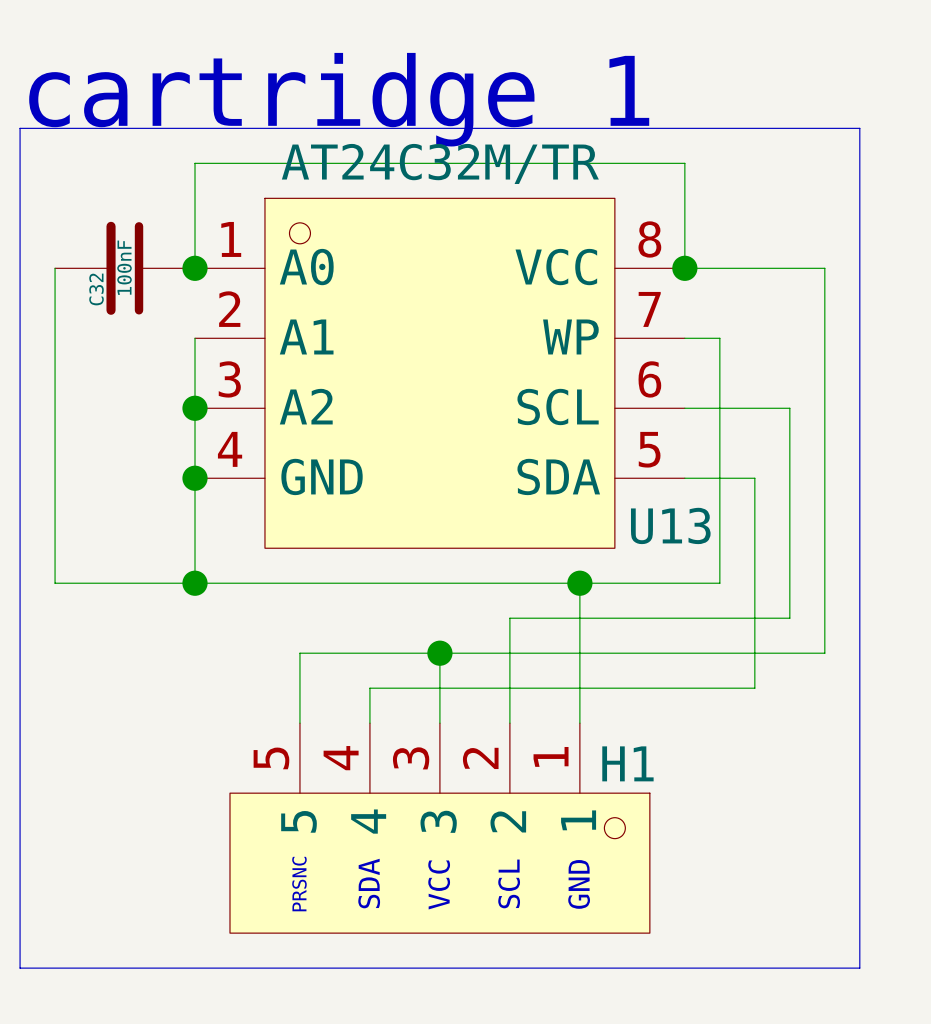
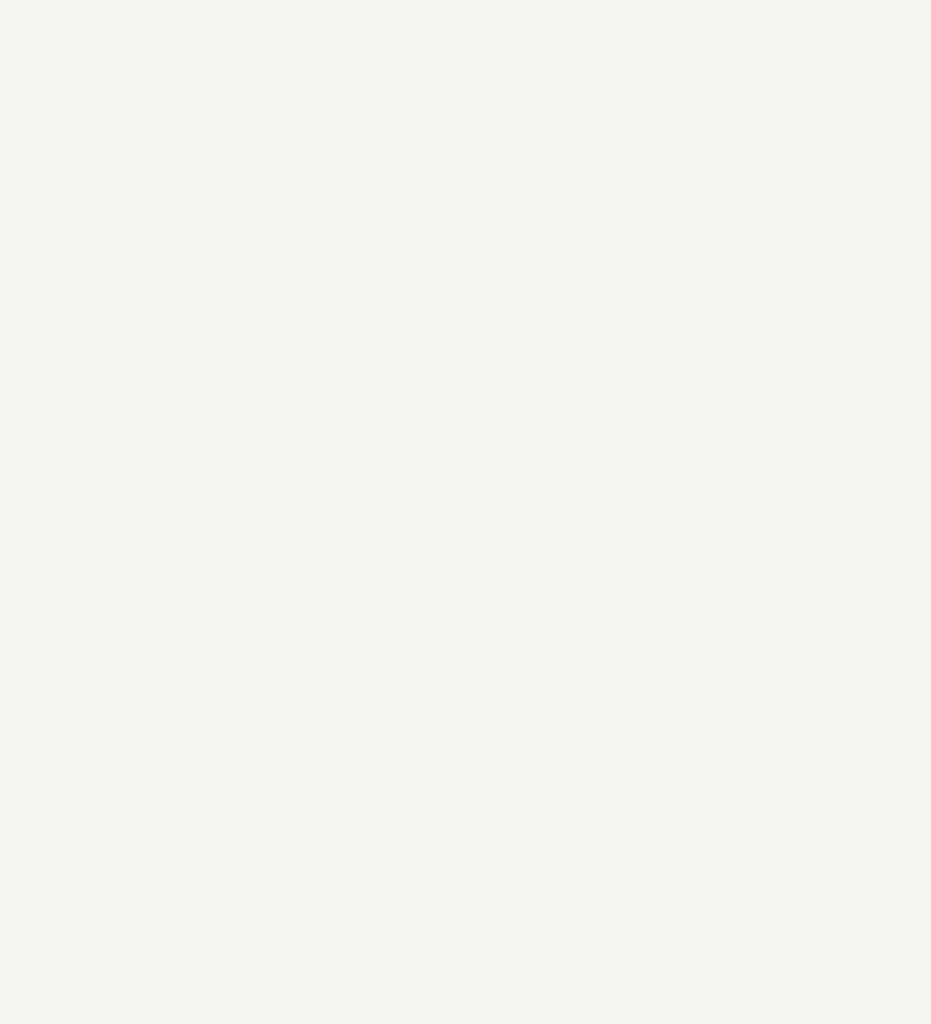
text: cartridge 1 (339, 99) -> none
line: (20, 128) (859, 128) (859, 968) (20, 968) (20, 128) -> none
wire: (55, 268) (55, 583) (719, 583) (719, 338) (684, 338) -> none
C32: 100nF (125, 268) -> none
wire: (195, 268) (195, 163) (684, 163) (684, 268) (824, 268) (824, 653) (299, 653) (299, 723) -> none
junction: (195, 268) -> none
junction: (684, 268) -> none
wire: (195, 338) (195, 583) -> none
U13: AT24C32M/TR (439, 373) -> none
junction: (195, 408) -> none
wire: (684, 408) (789, 408) (789, 618) (509, 618) (509, 723) -> none
junction: (195, 478) -> none
wire: (684, 478) (754, 478) (754, 688) (369, 688) (369, 723) -> none
junction: (195, 583) -> none
wire: (579, 583) (579, 723) -> none
junction: (579, 583) -> none
wire: (439, 653) (439, 723) -> none
junction: (439, 653) -> none
H1: (439, 828) -> none
text: SDA (369, 883) -> none
text: SCL (509, 883) -> none
text: PRSNC (299, 884) -> none
text: VCC (439, 884) -> none
text: GND (579, 884) -> none

